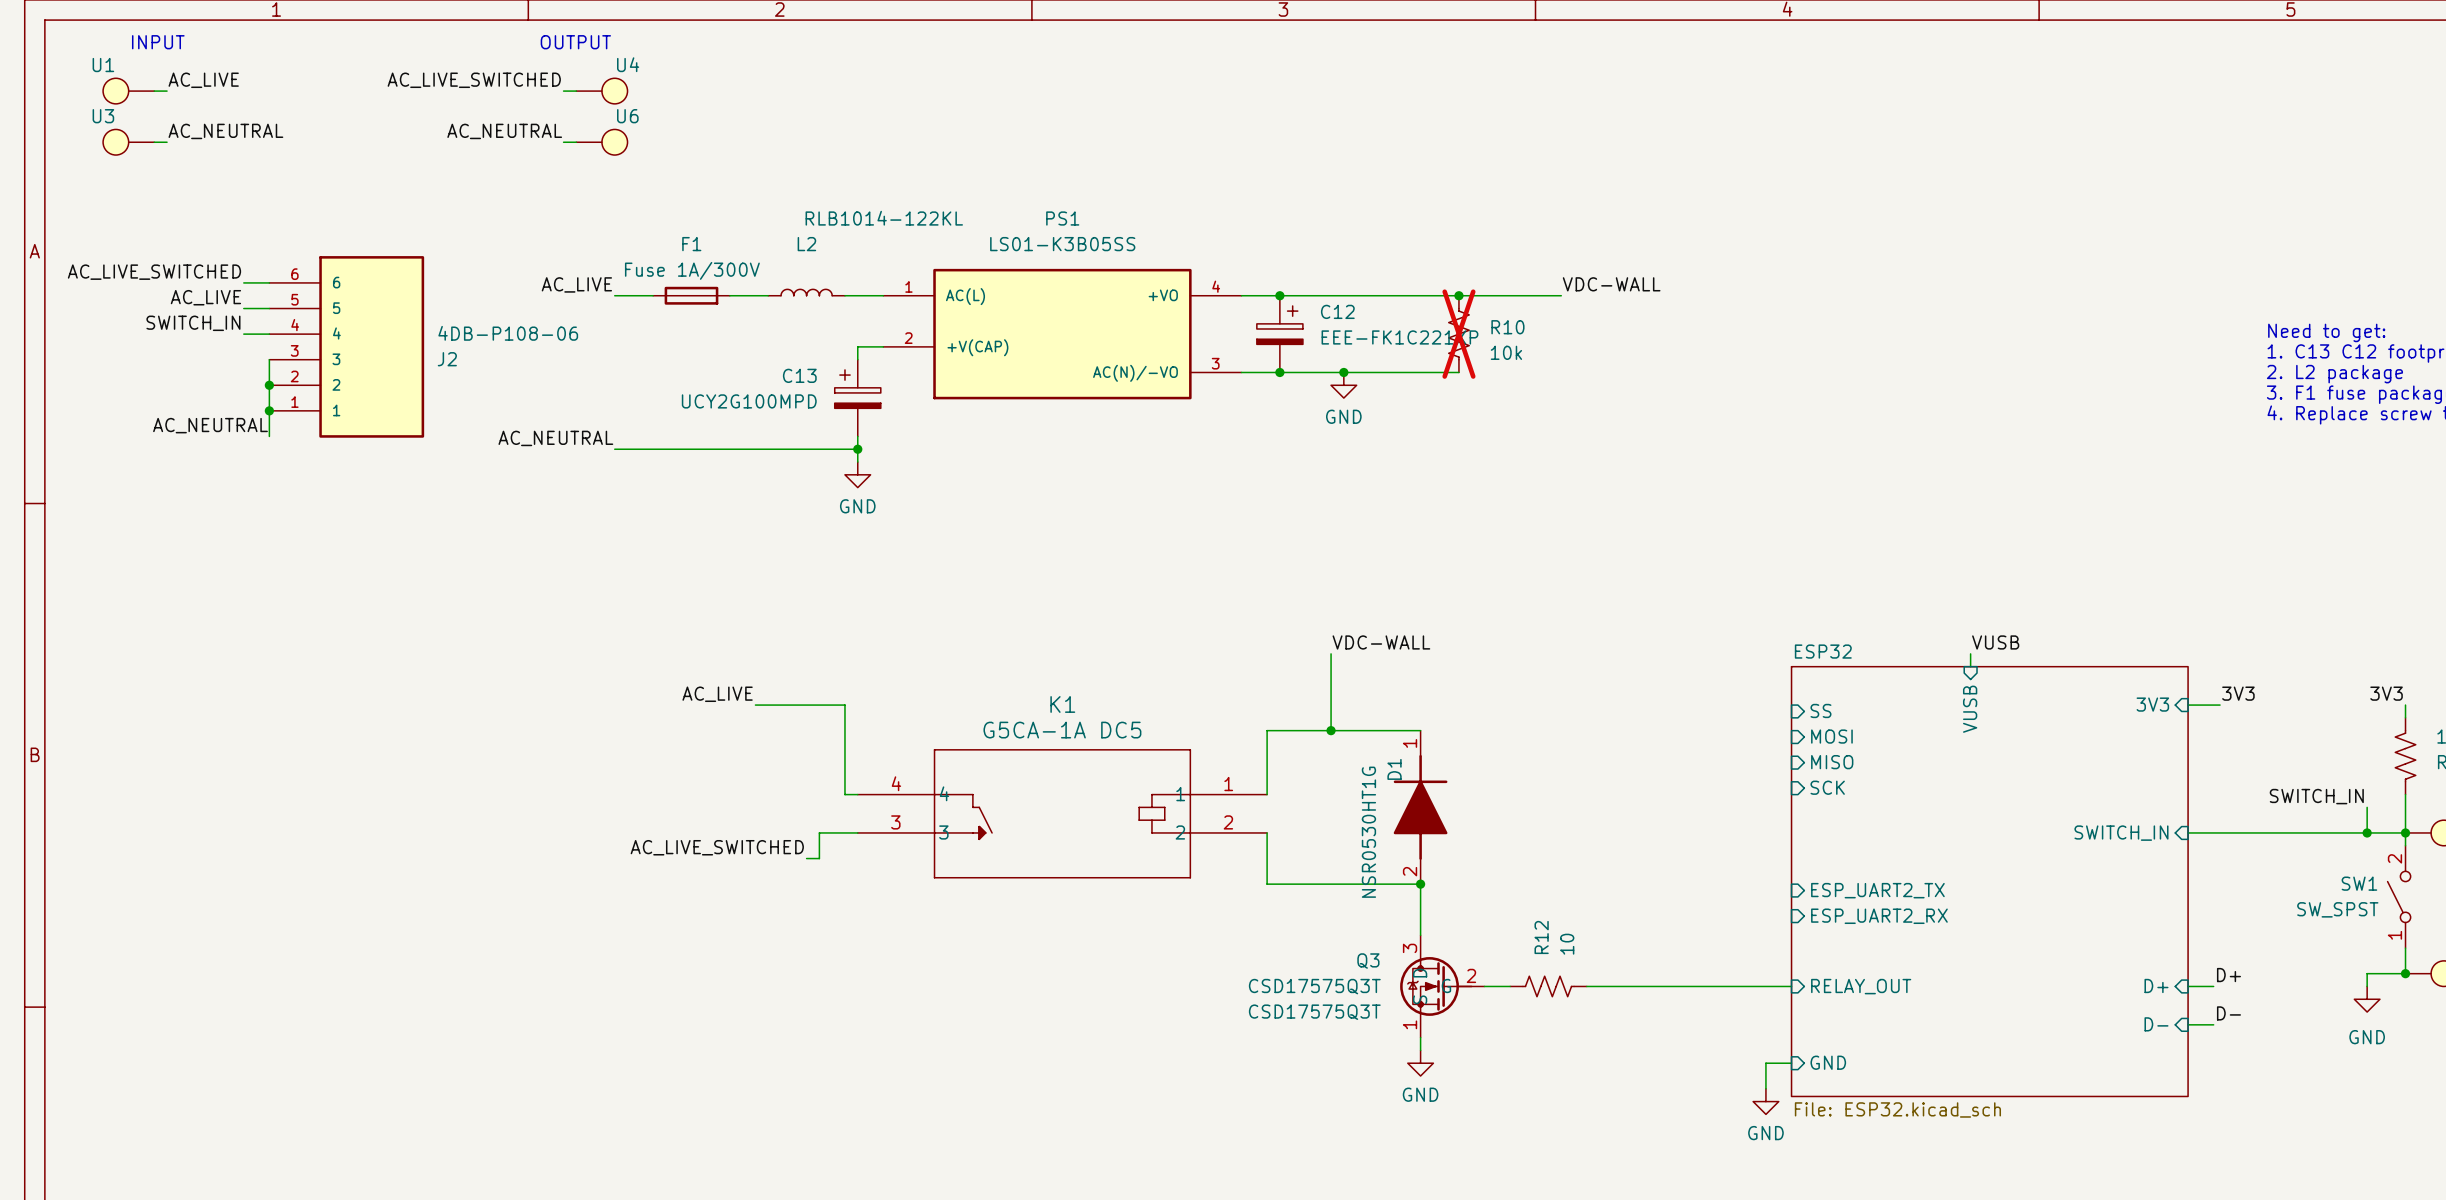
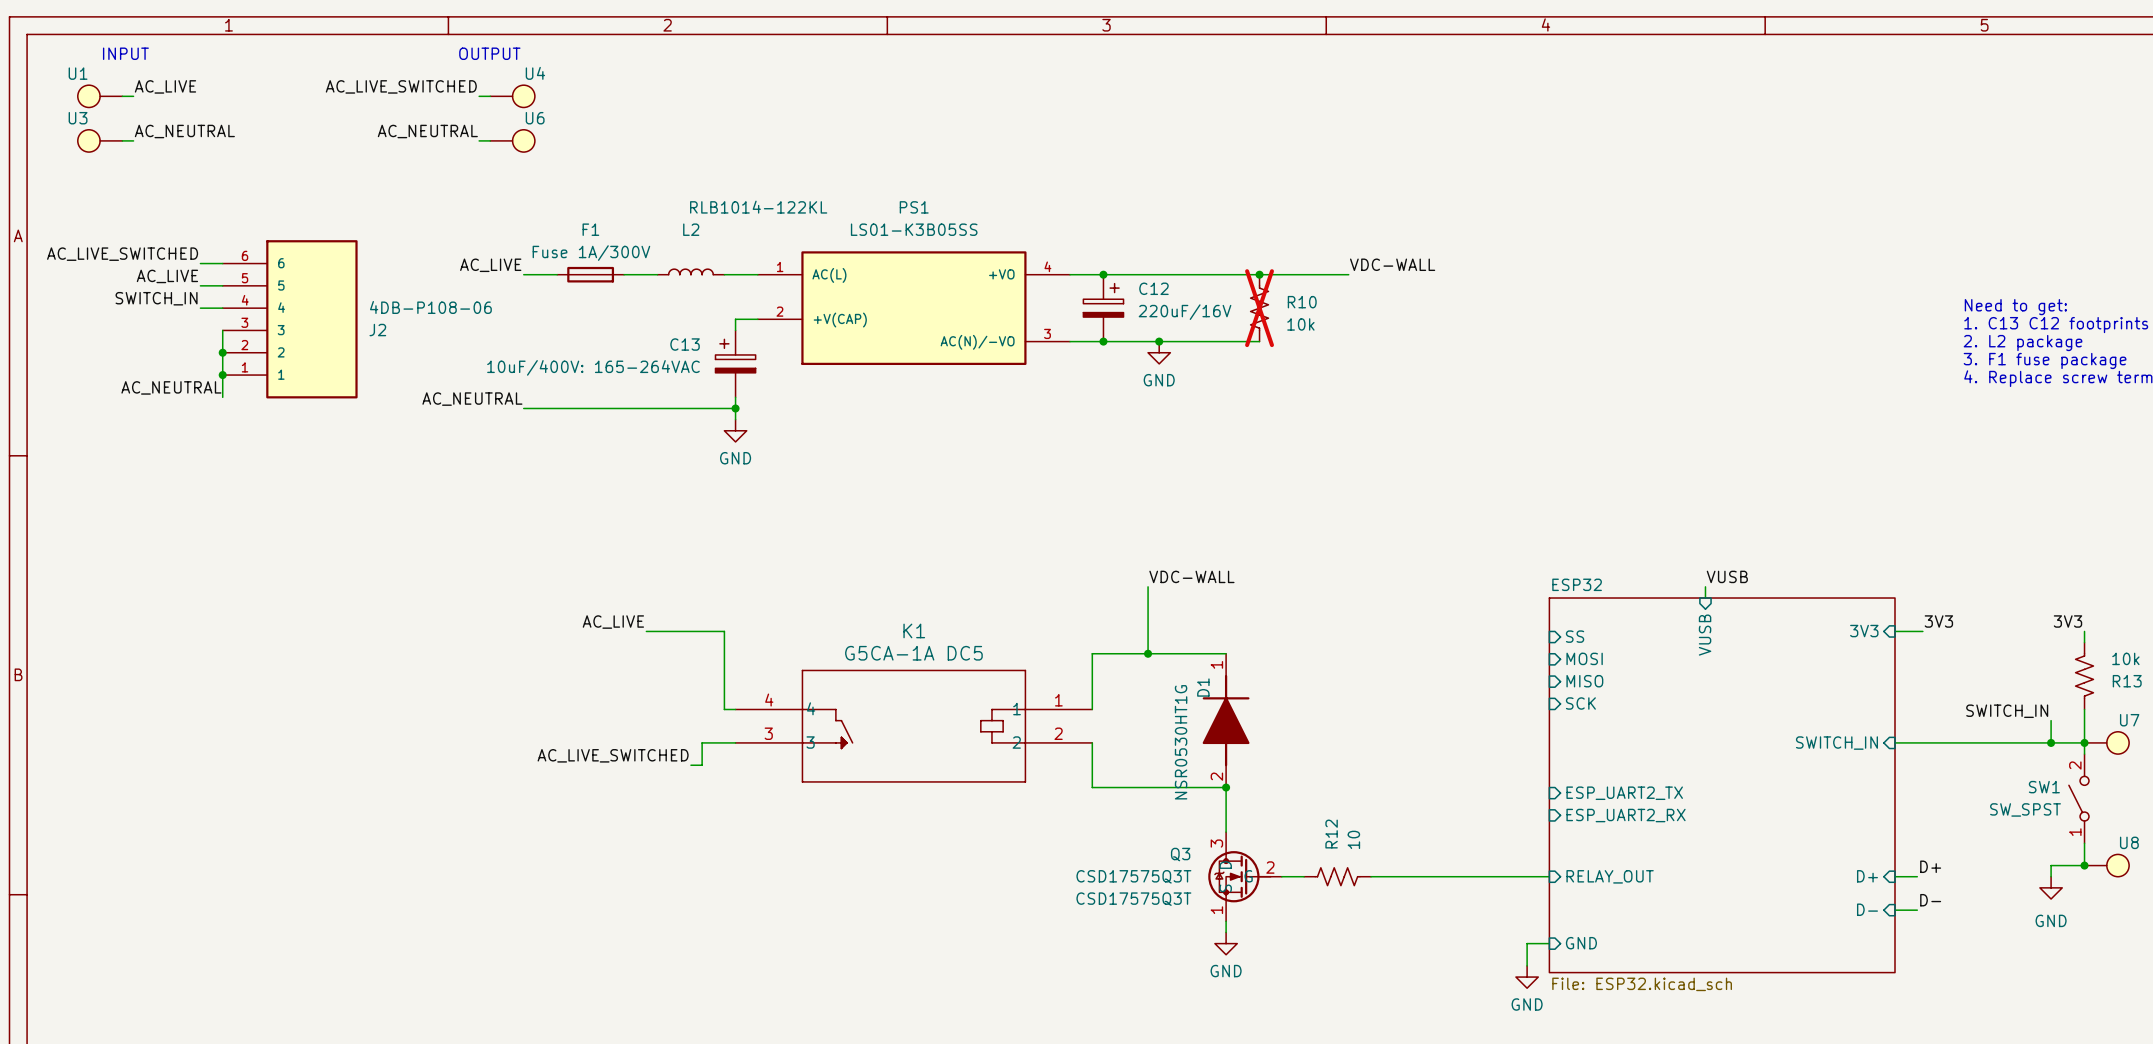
C12 value: EEE-FK1C221XP (1399, 337) -> 220uF/16V (1185, 312)
C13 value: UCY2G100MPD (749, 401) -> 10uF/400V: 165-264VAC (593, 367)

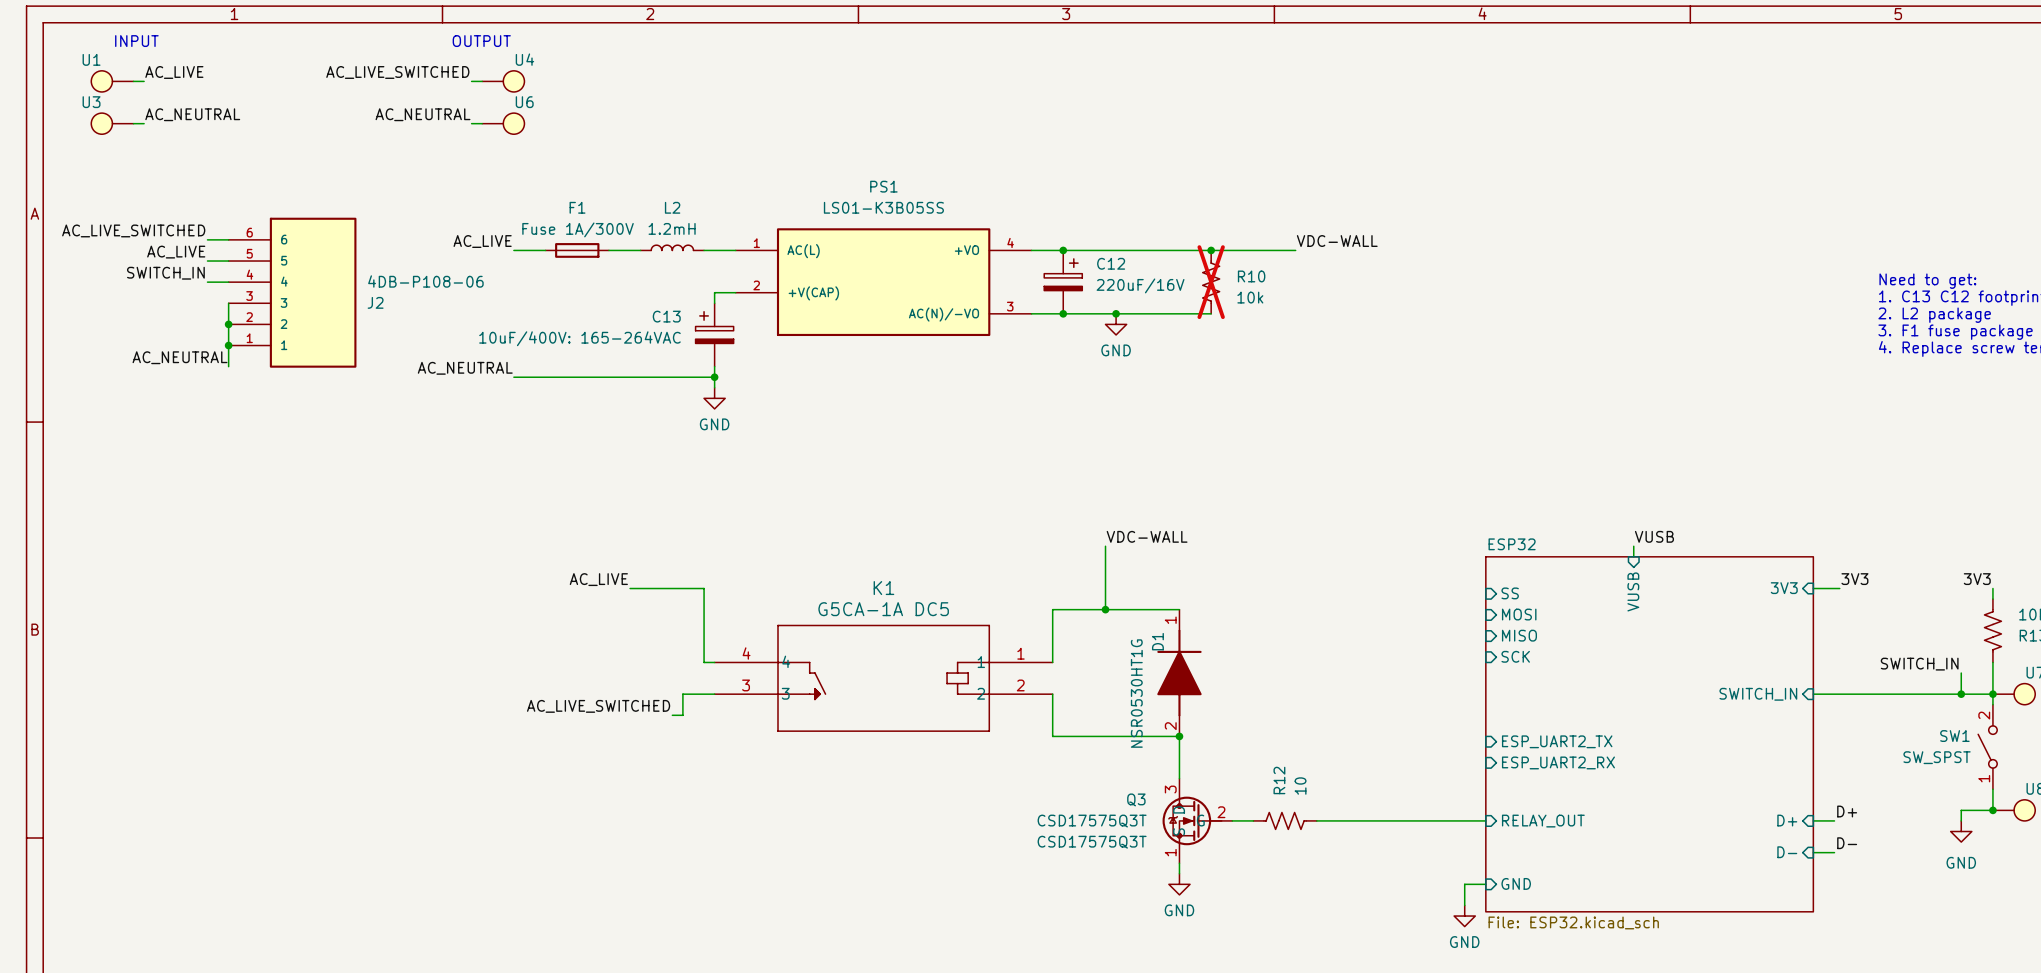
L2 value: RLB1014-122KL (758, 207) -> 1.2mH (672, 228)

